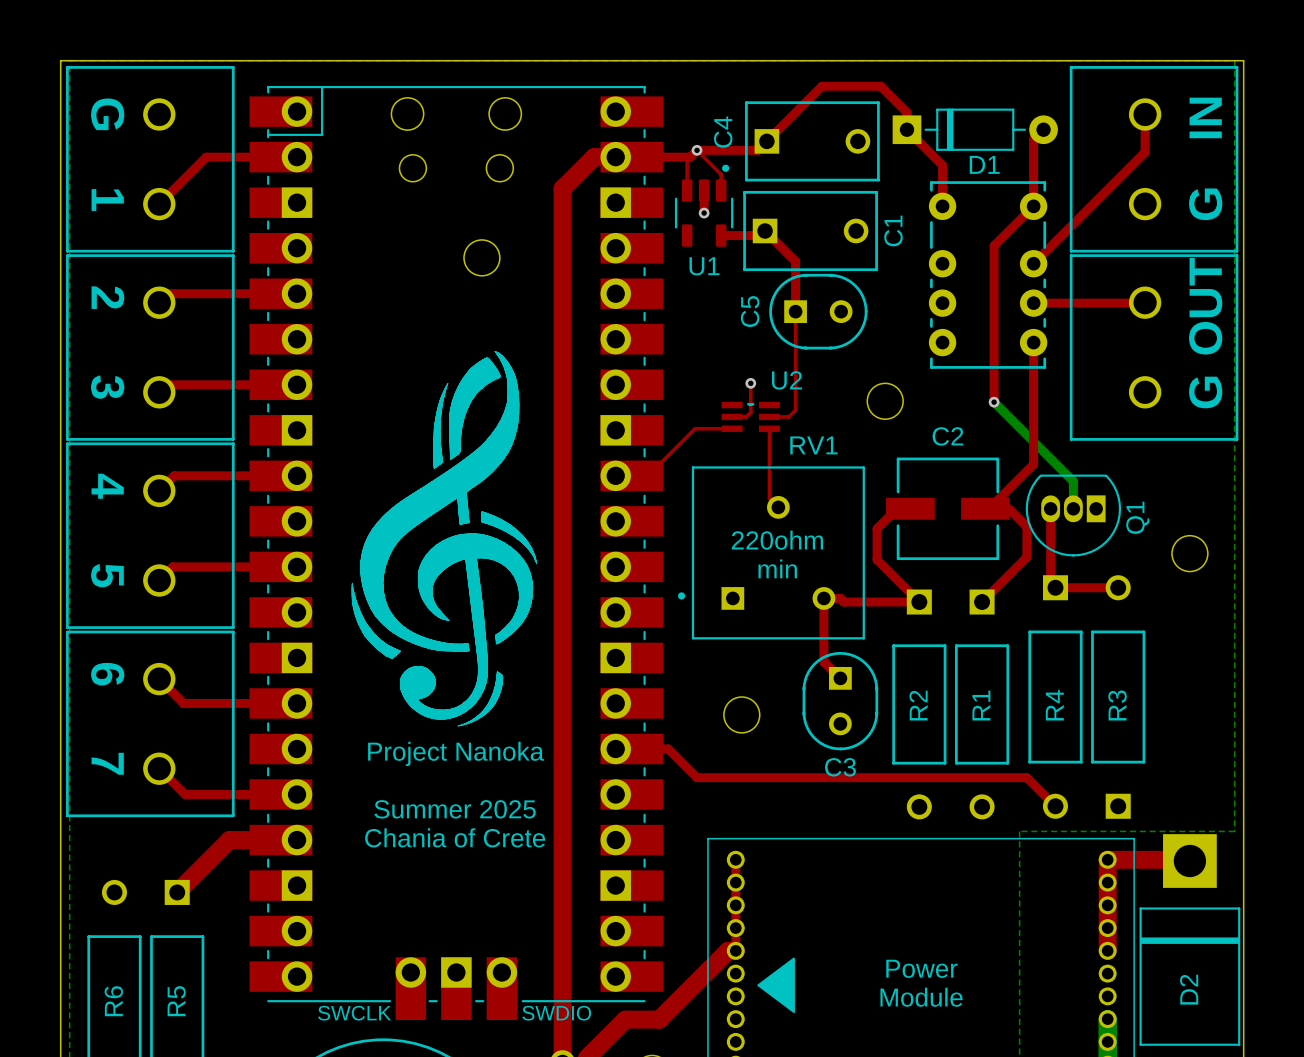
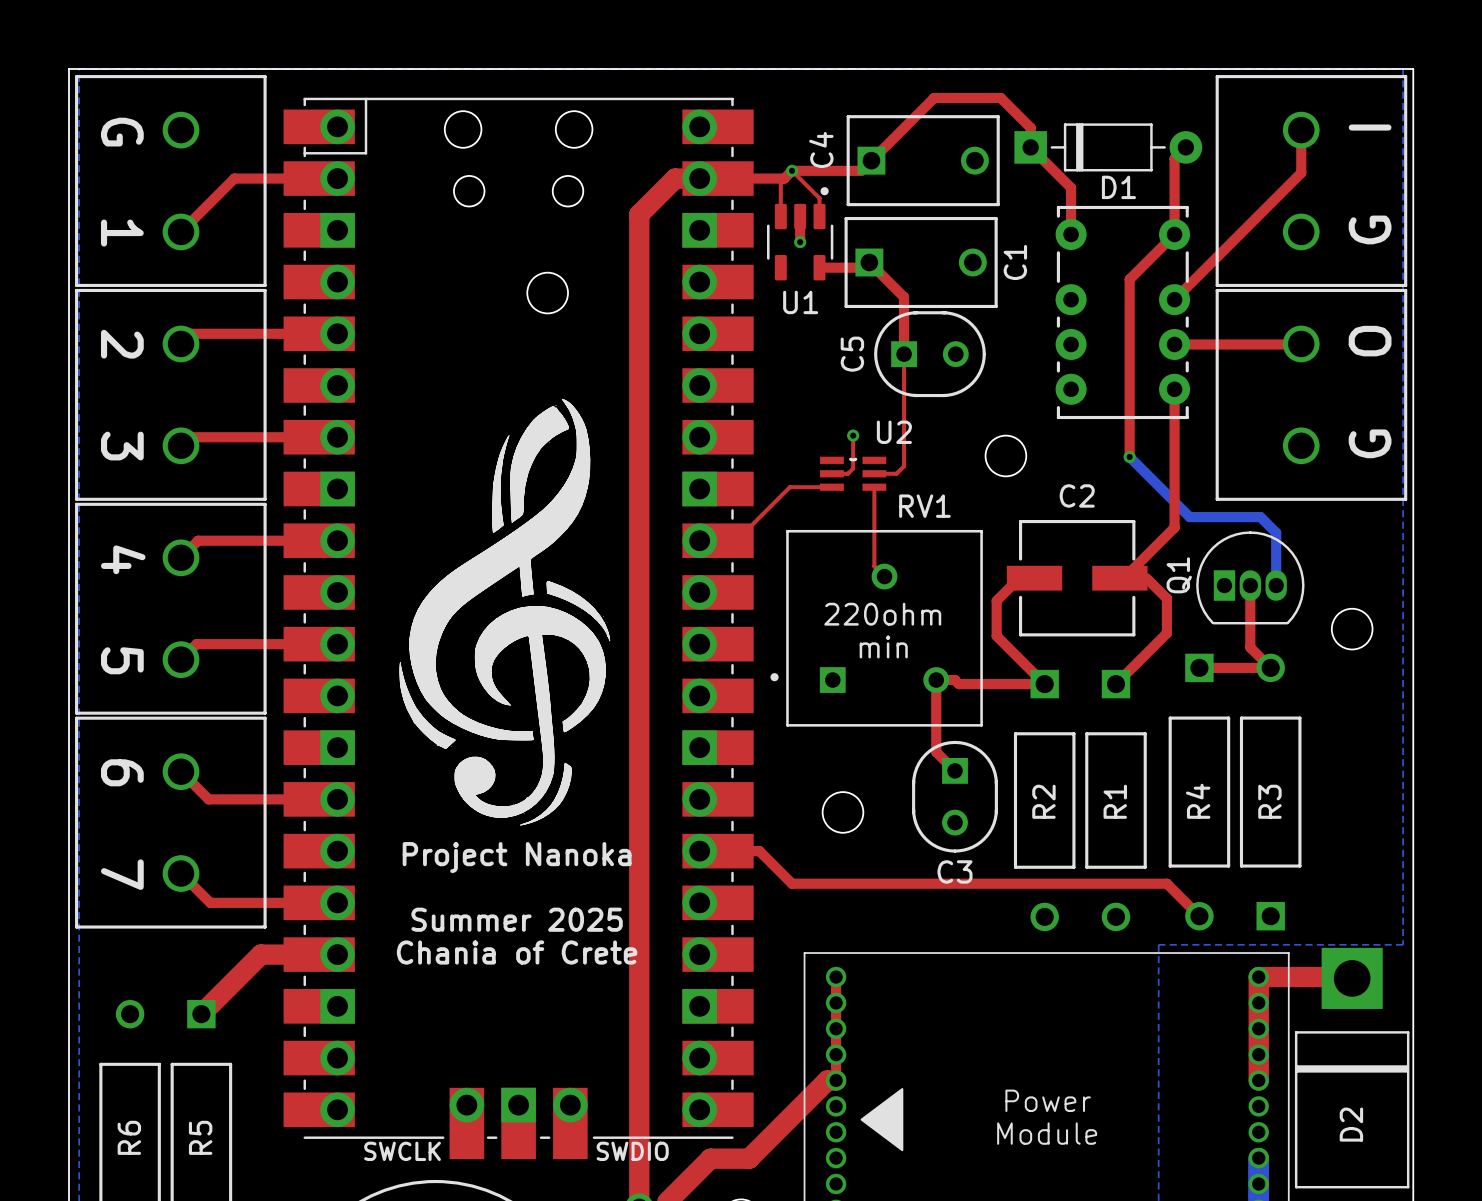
text: IN (1205, 117) -> I (1370, 127)
text: none -> O (1370, 341)
text: OUT (1205, 306) -> none
bottom track: (1046, 455) (1073, 481) (1073, 508) -> (1189, 517) (1260, 517) (1276, 532) (1276, 585)
top track: (1050, 508) (1050, 582) -> none
Q1 rotation: 0° (1073, 515) -> 180° (1250, 577)
top track: none -> (1250, 585) (1250, 647) (1270, 667)

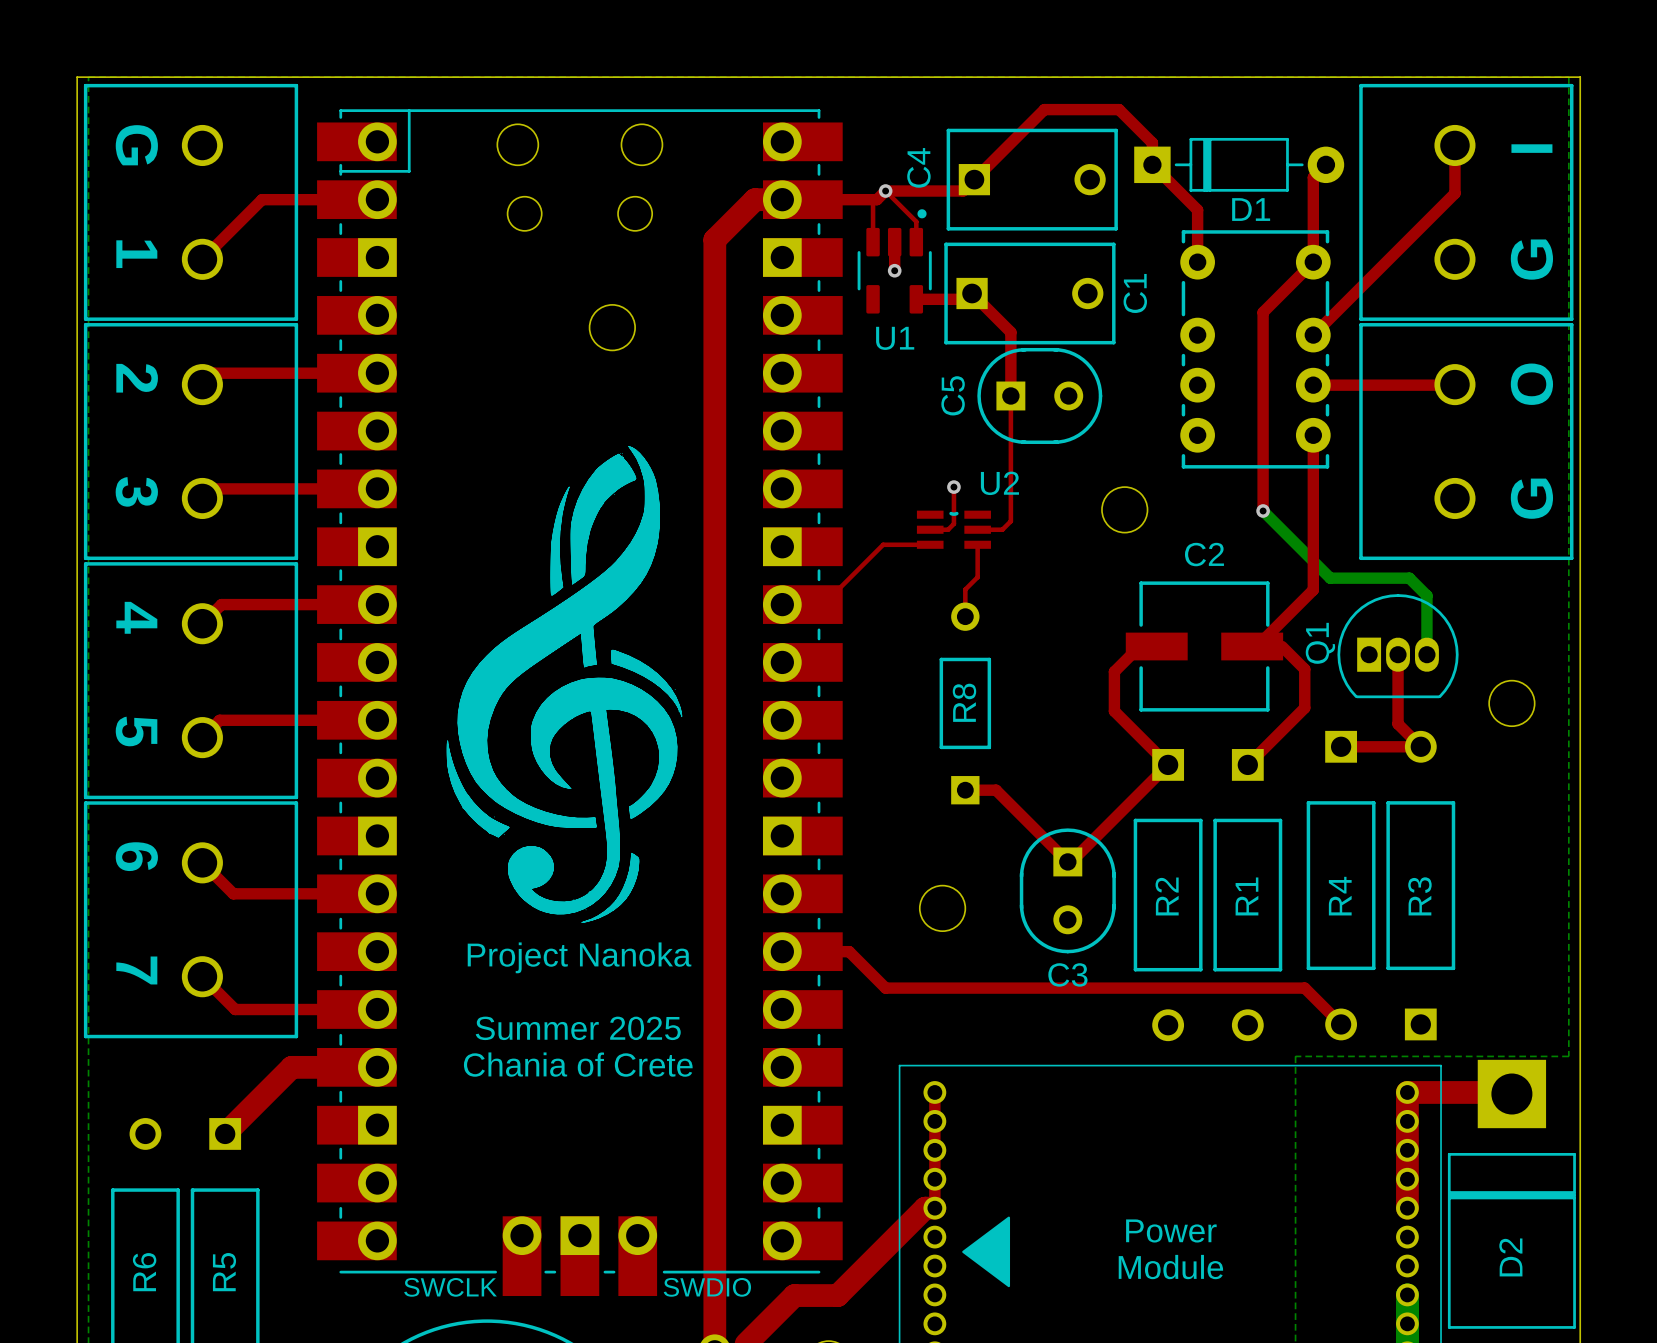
top track: (874, 516) (874, 566) (884, 576) -> (977, 577) (965, 589) (965, 616)
text: 220ohm (882, 614) -> none
RV1: (876, 628) -> none
R8: none -> (965, 703)
text: min (883, 646) -> none
top track: (1044, 684) (959, 684) (955, 680) (936, 680) (936, 752) -> (1168, 764) (1071, 861) (1067, 861)
top track: none -> (965, 790) (996, 790) (1046, 840)

